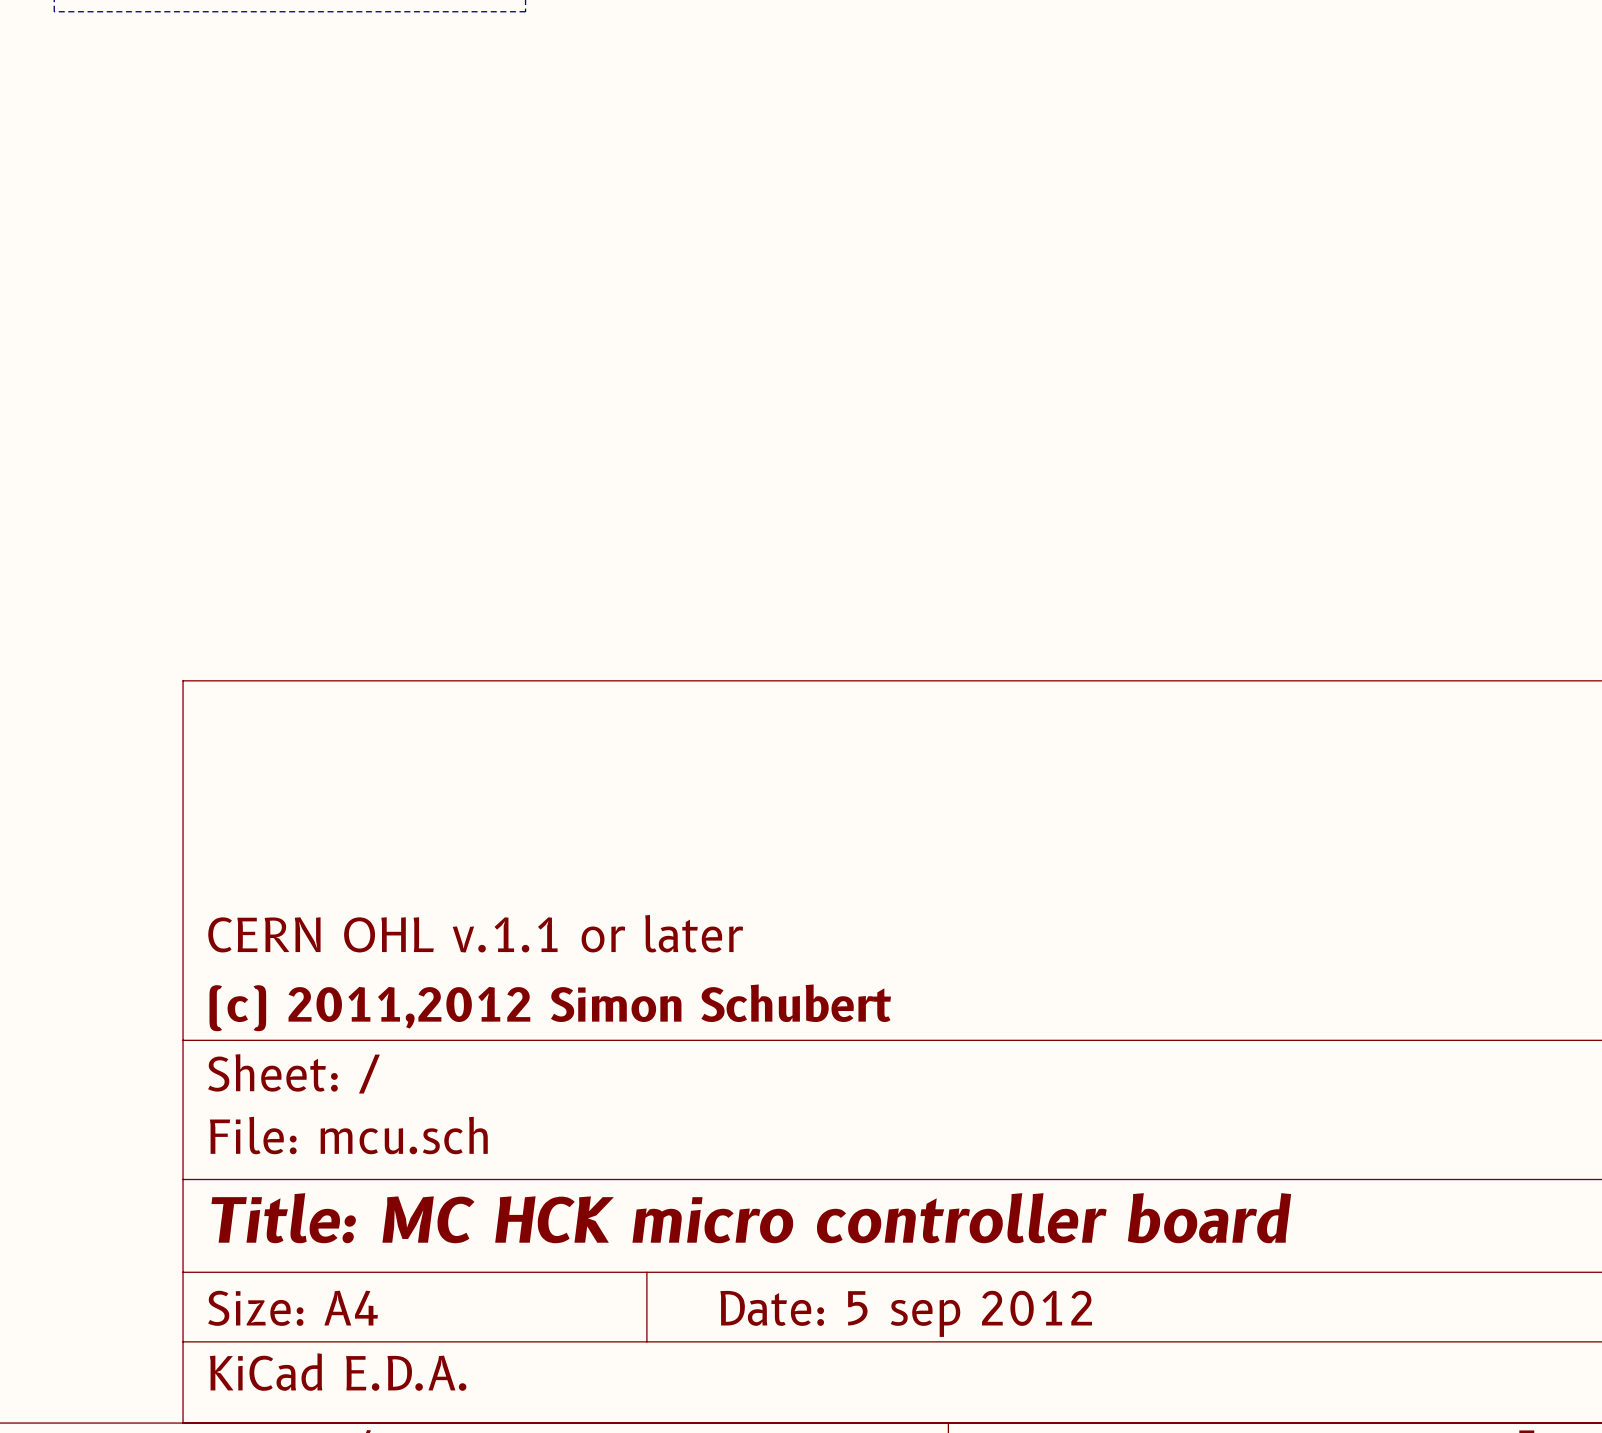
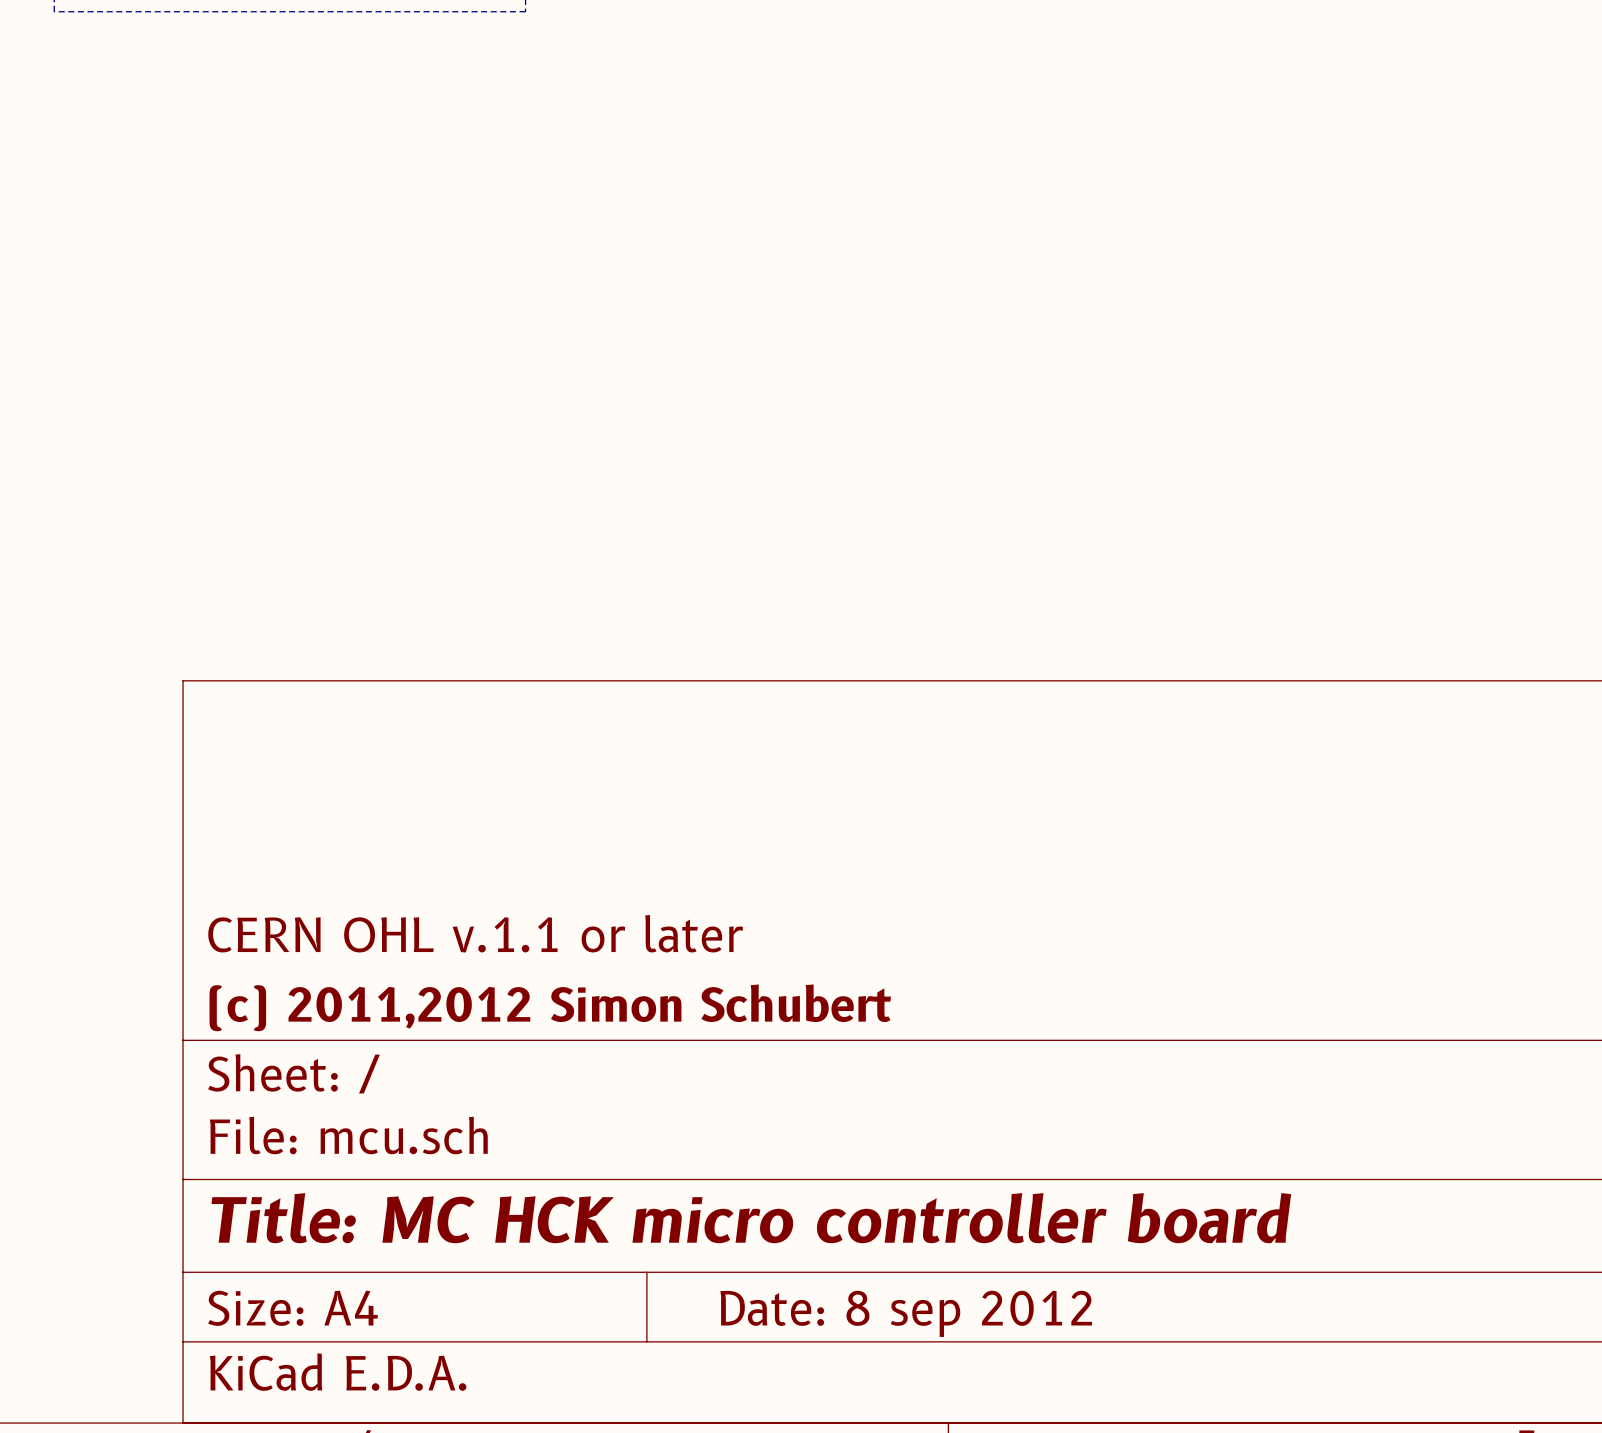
title block: Date: 5 sep 2012 (906, 1313) -> Date: 8 sep 2012 (906, 1313)

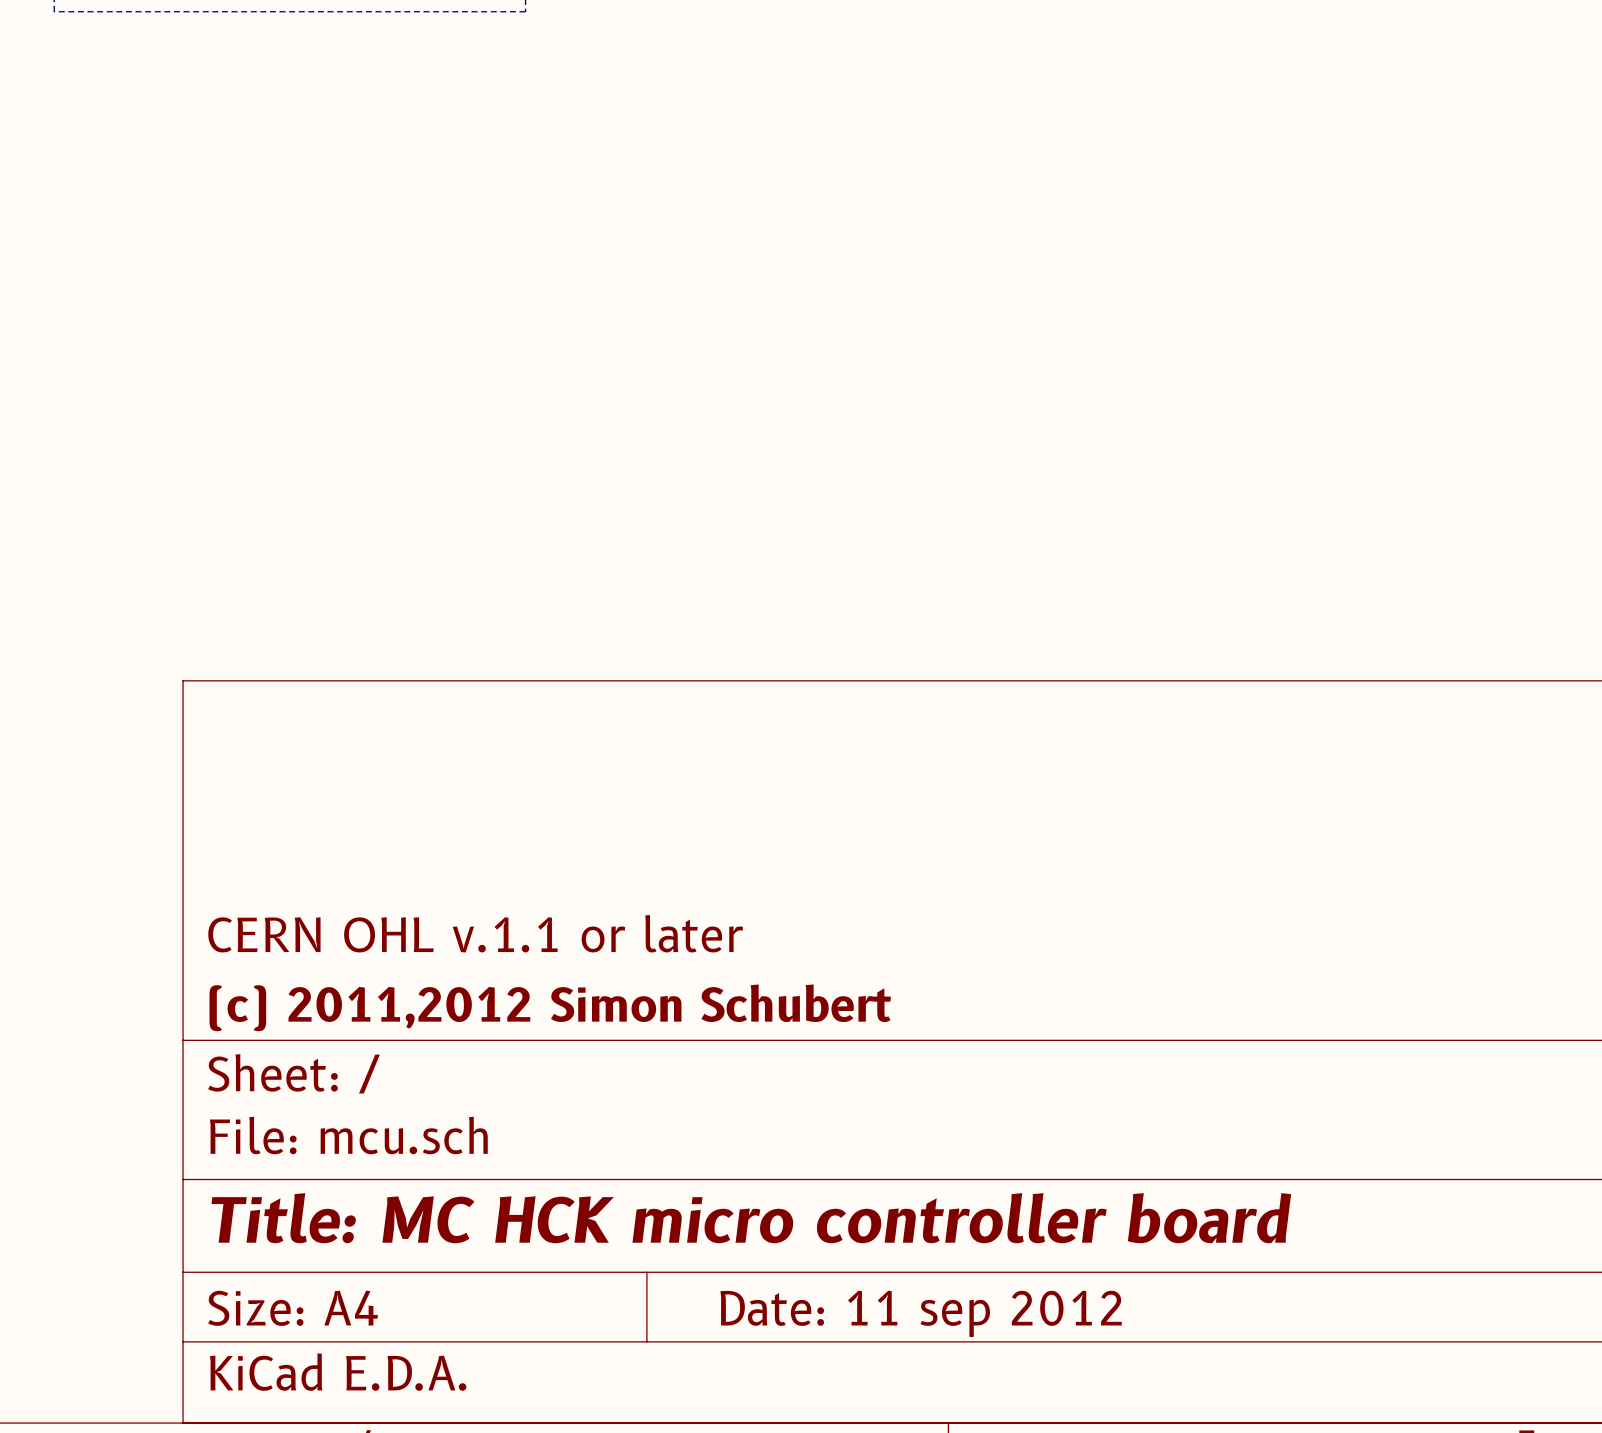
title block: Date: 8 sep 2012 (906, 1313) -> Date: 11 sep 2012 (921, 1313)

